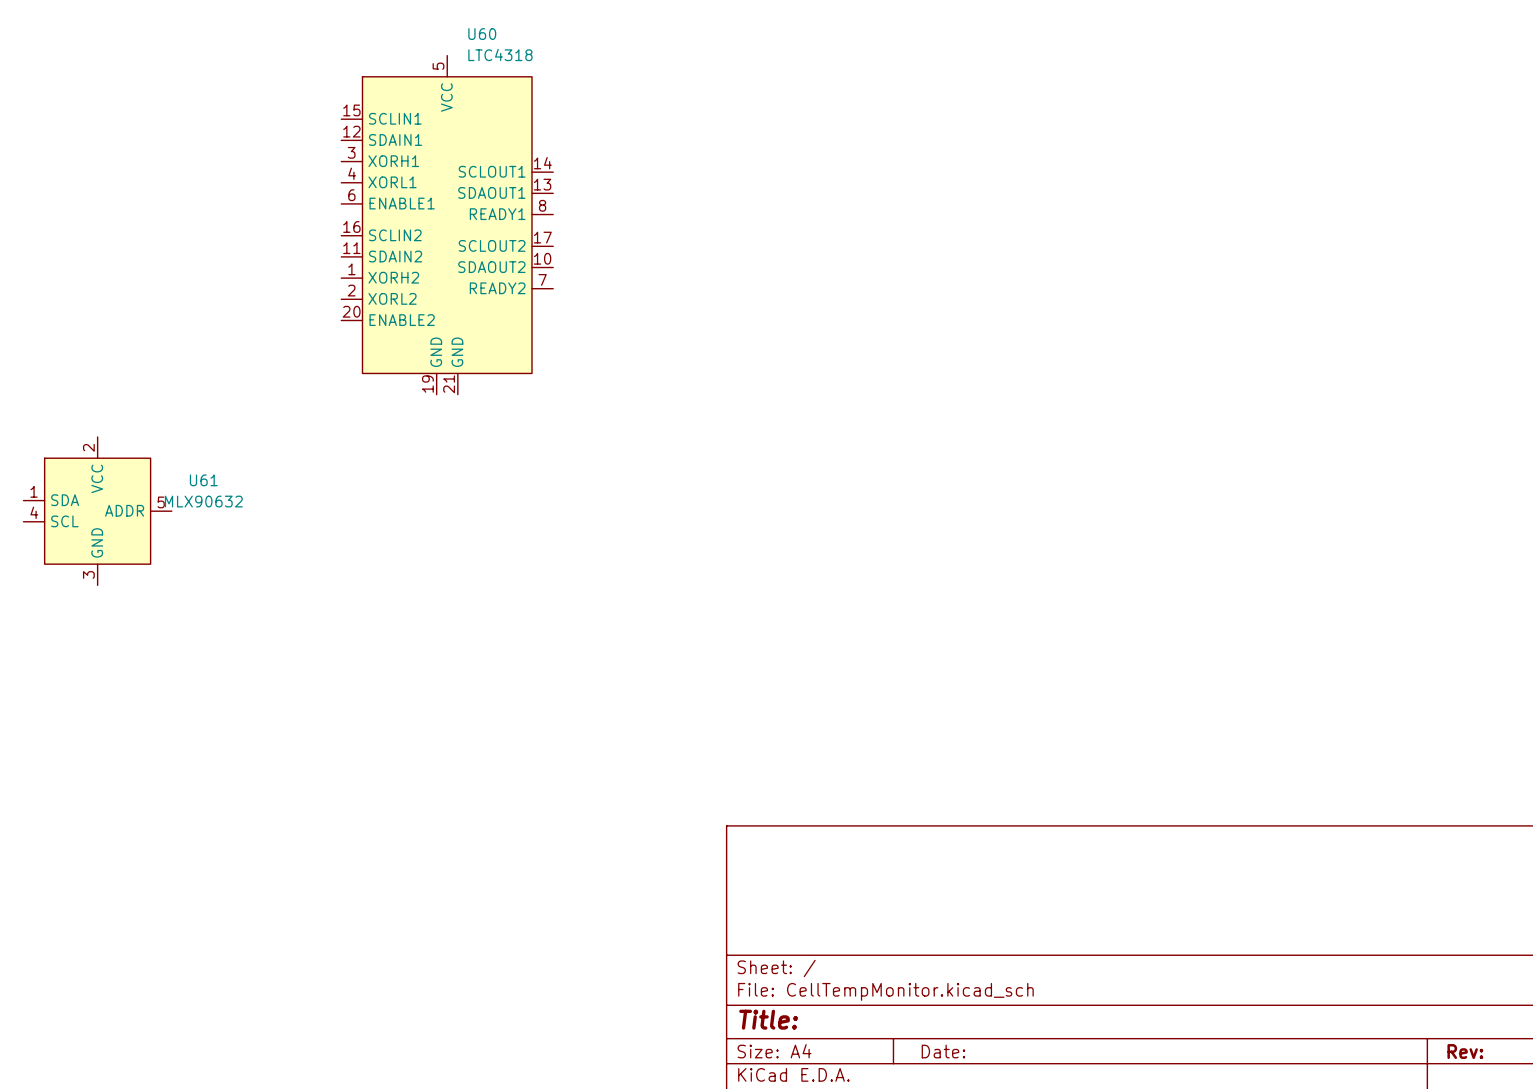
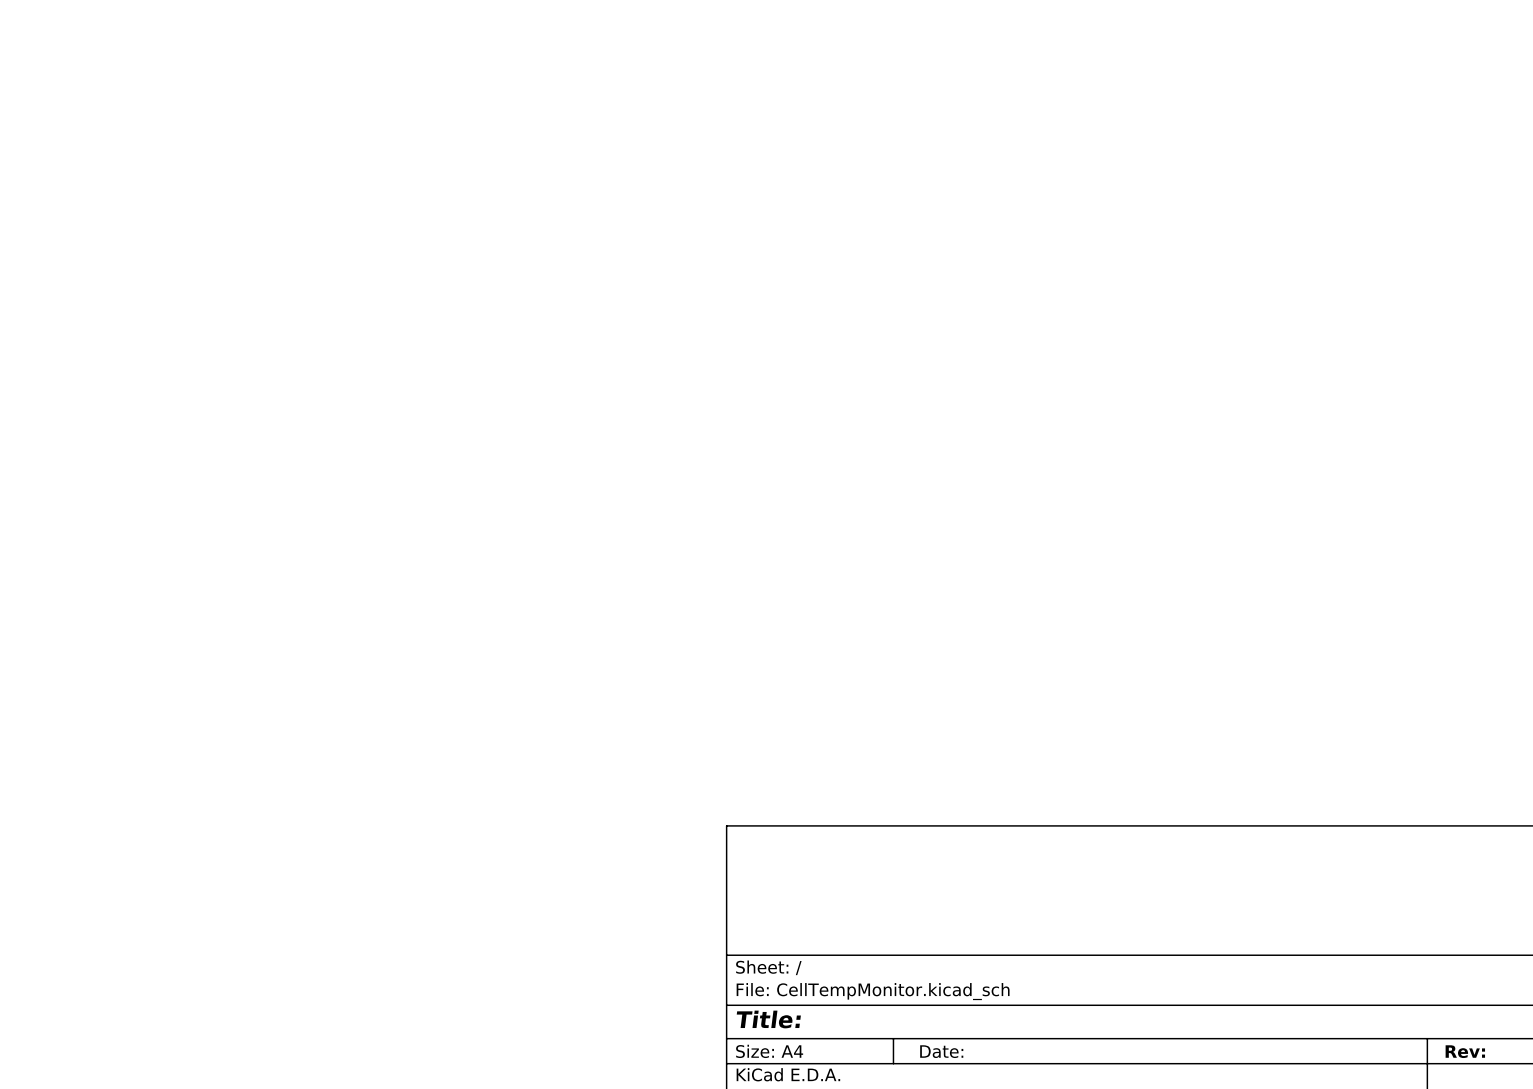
U60: LTC4318 (447, 225) -> none
U61: MLX90632 (97, 511) -> none

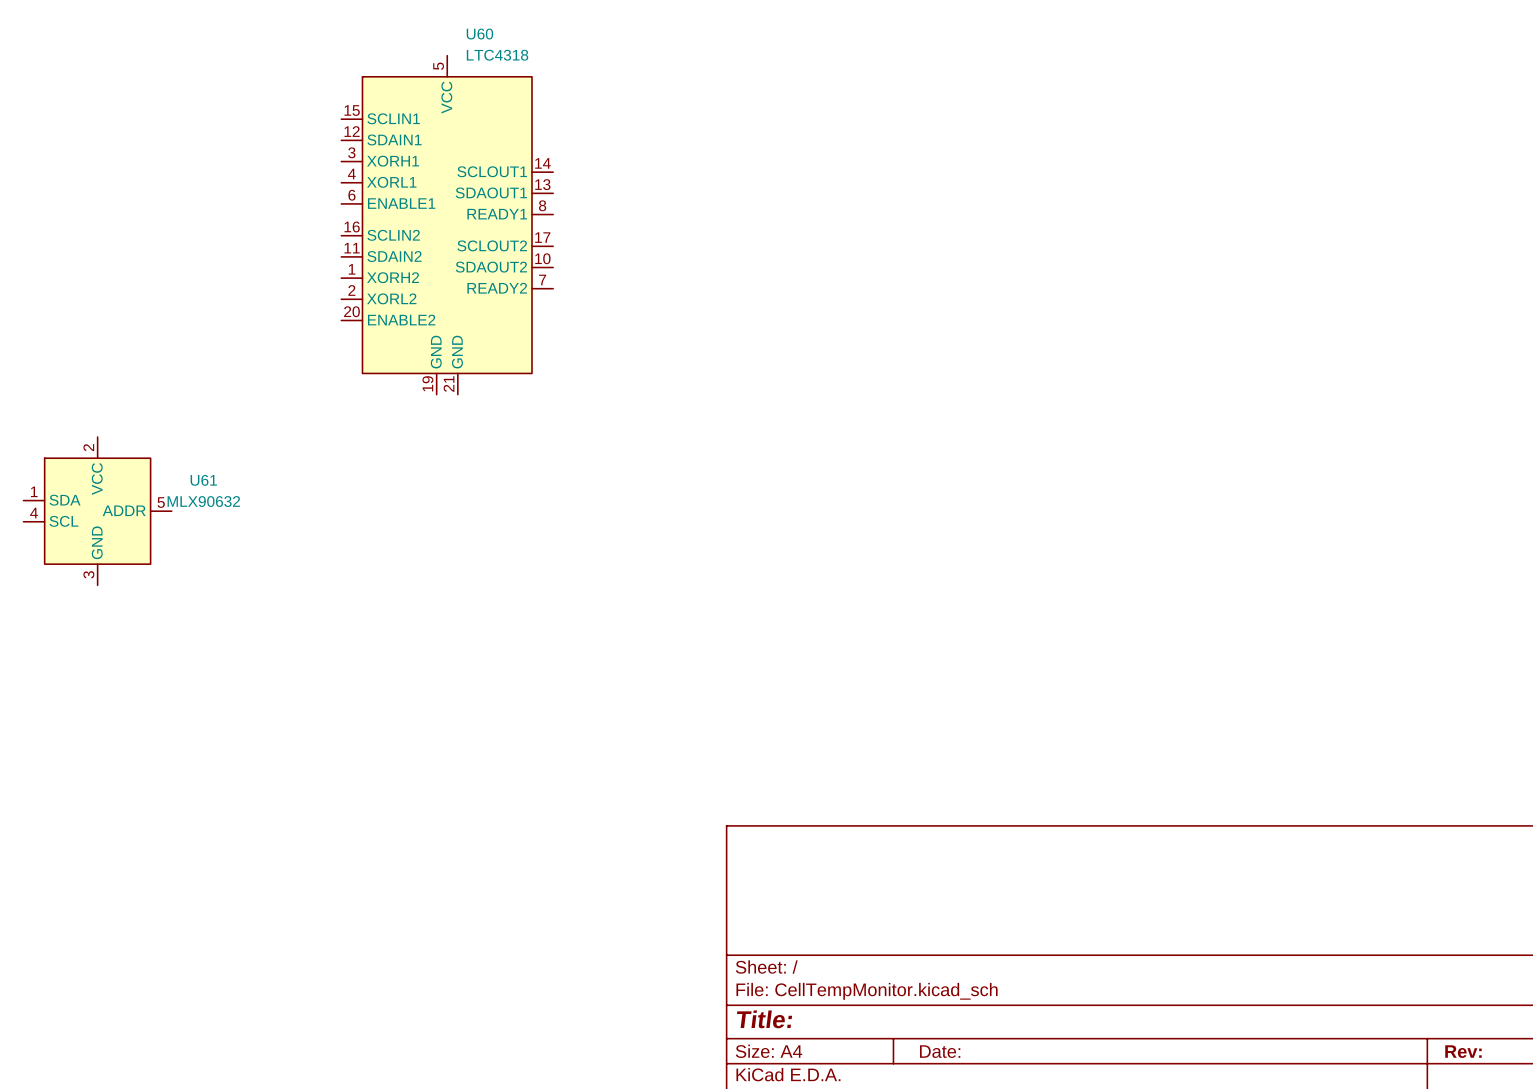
U60: none -> LTC4318 (447, 225)
U61: none -> MLX90632 (97, 511)

